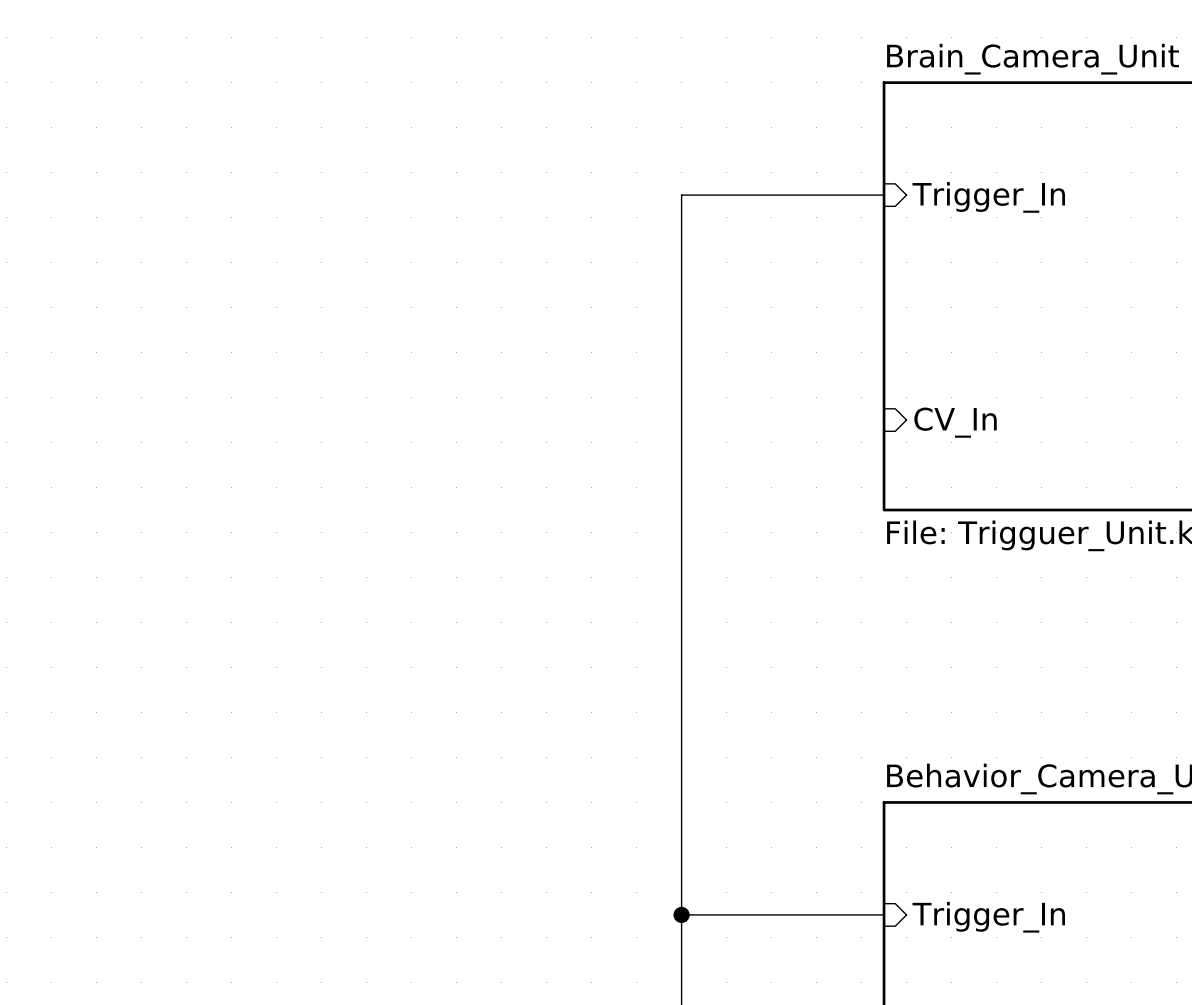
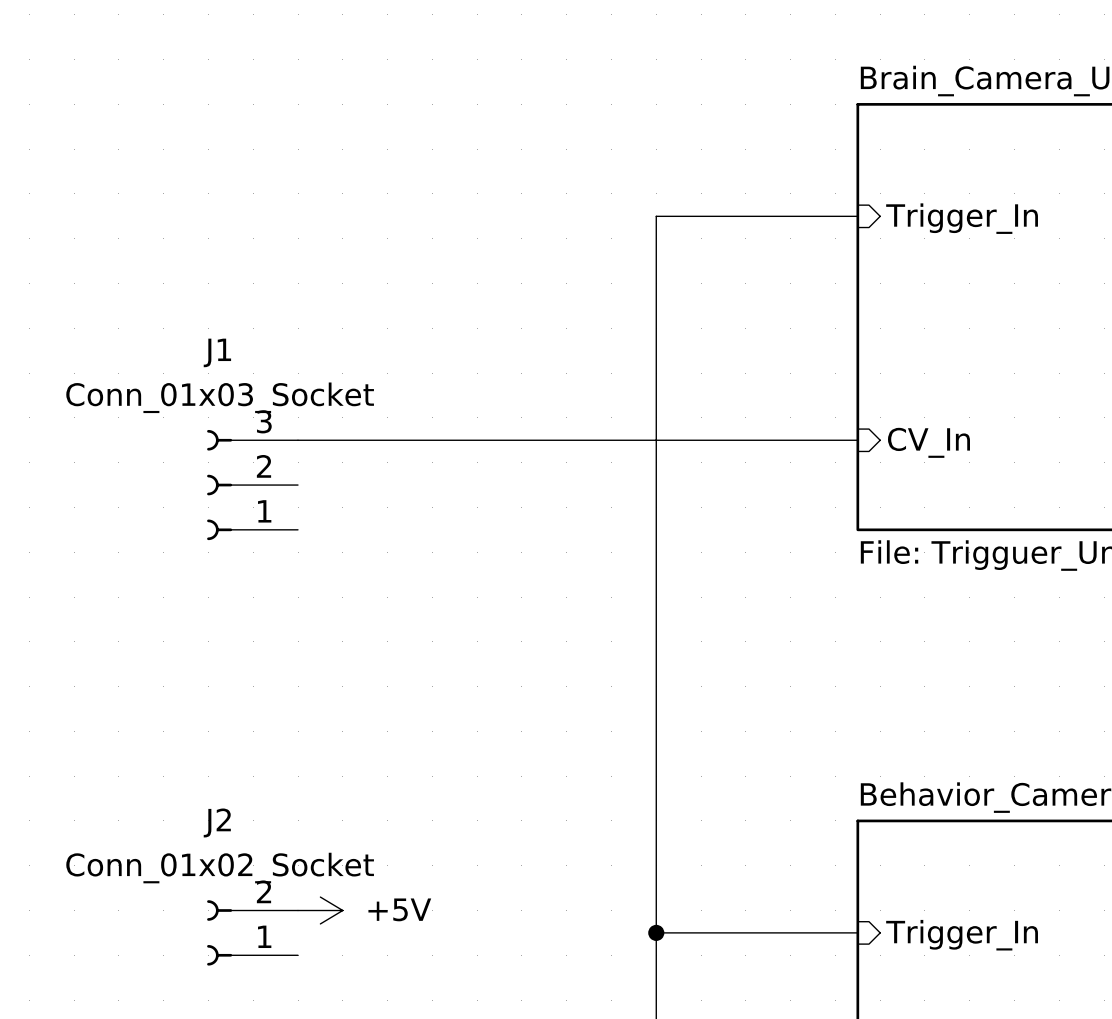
wire: none -> (298, 440) (857, 440)
J1: none -> Conn_01x03_Socket (252, 485)
power symbol: none -> +5V (320, 910)
J2: none -> Conn_01x02_Socket (252, 932)

